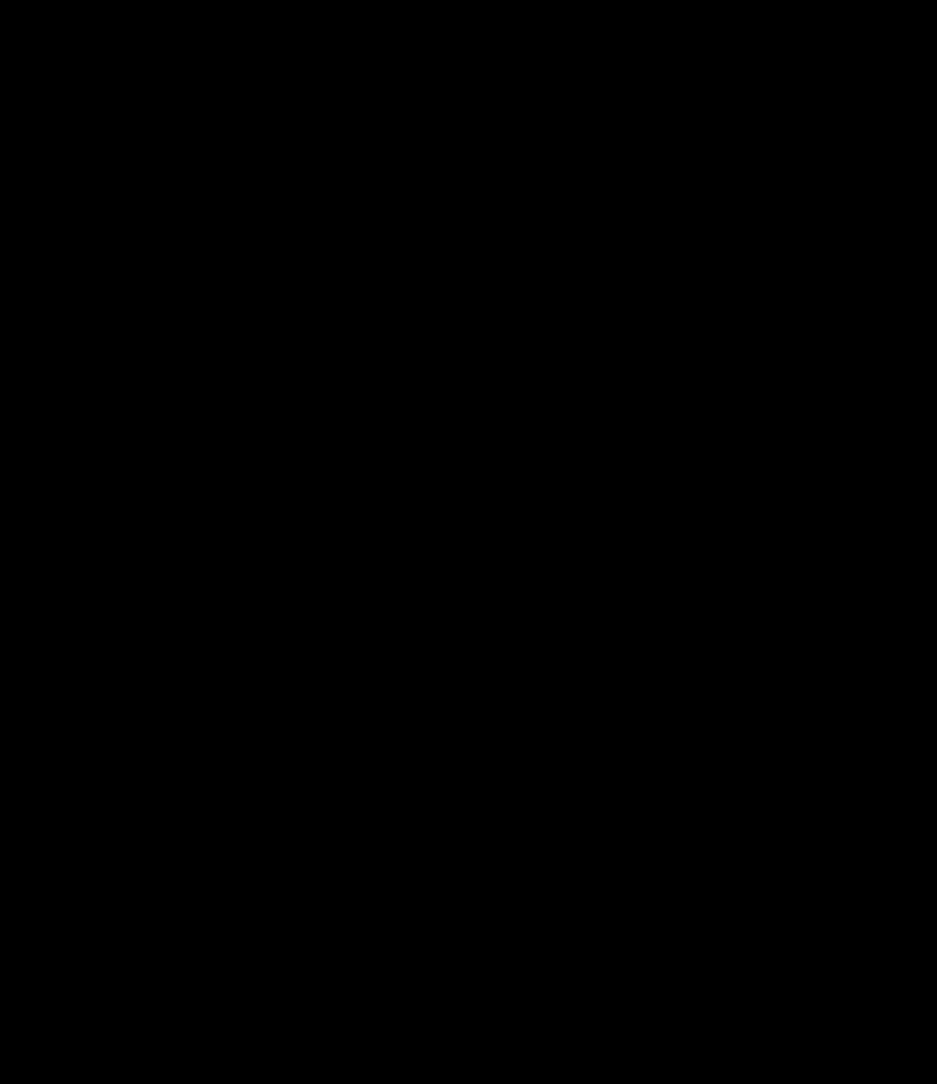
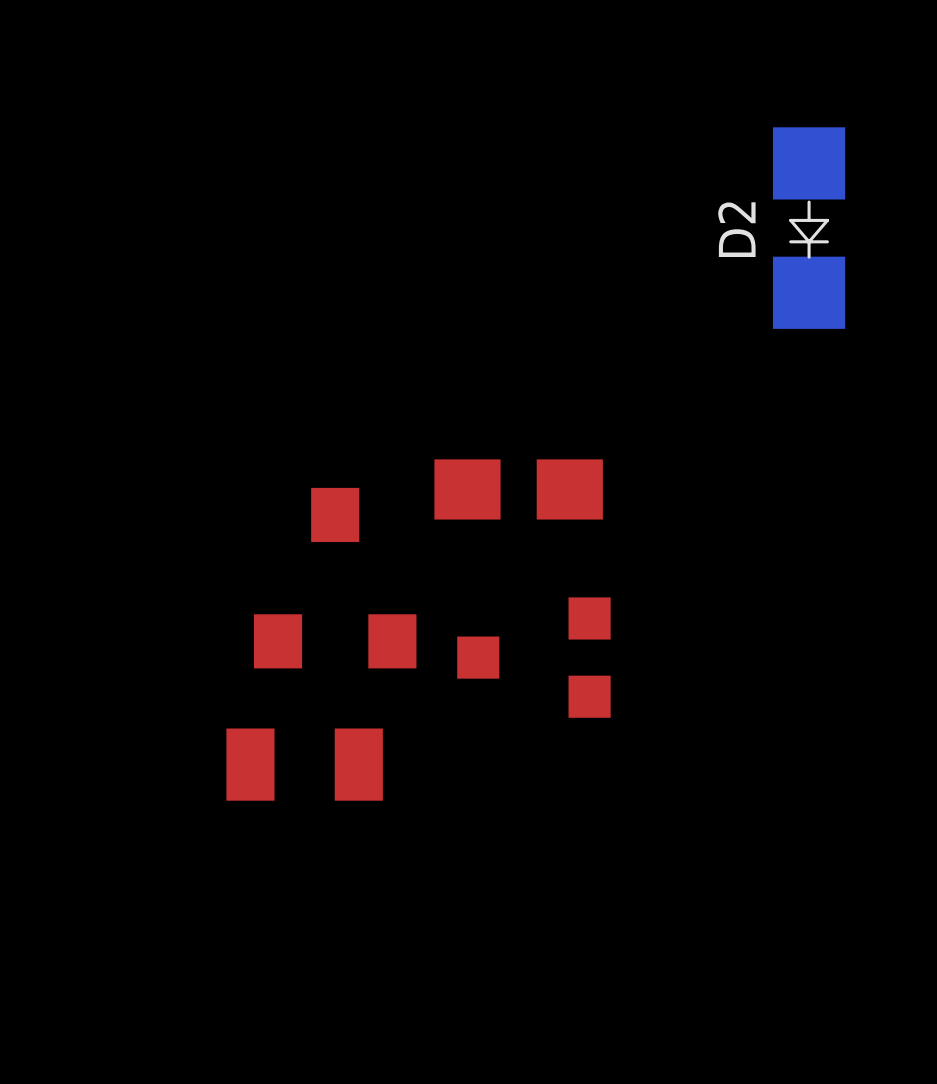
D2: none -> (809, 228)
part: none -> (518, 489)
part: none -> (335, 578)
part: none -> (533, 657)
part: none -> (304, 764)

